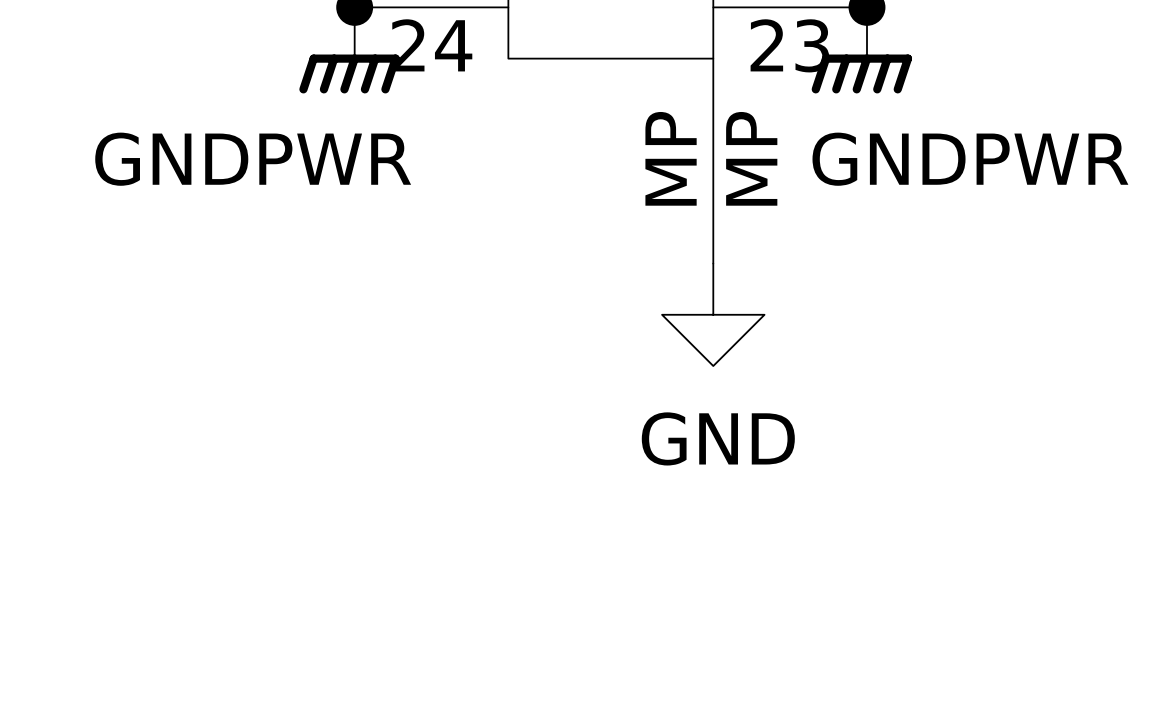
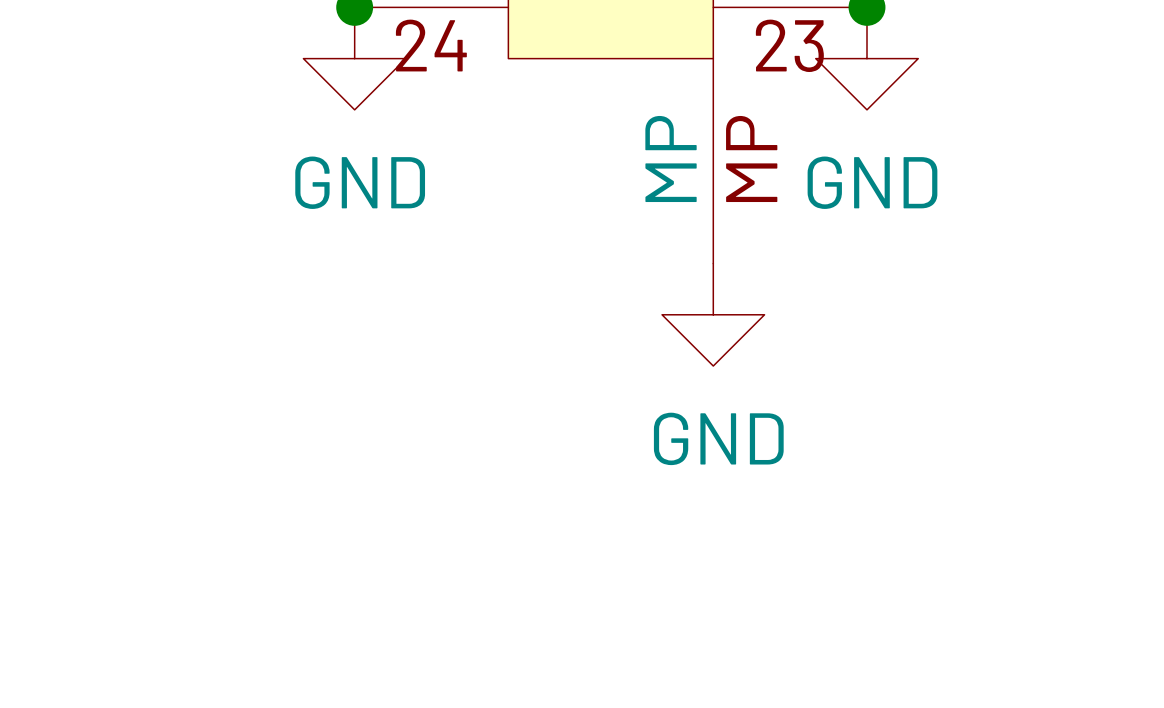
power symbol: GNDPWR (349, 50) -> GND (354, 58)
power symbol: GNDPWR (861, 50) -> GND (867, 58)

